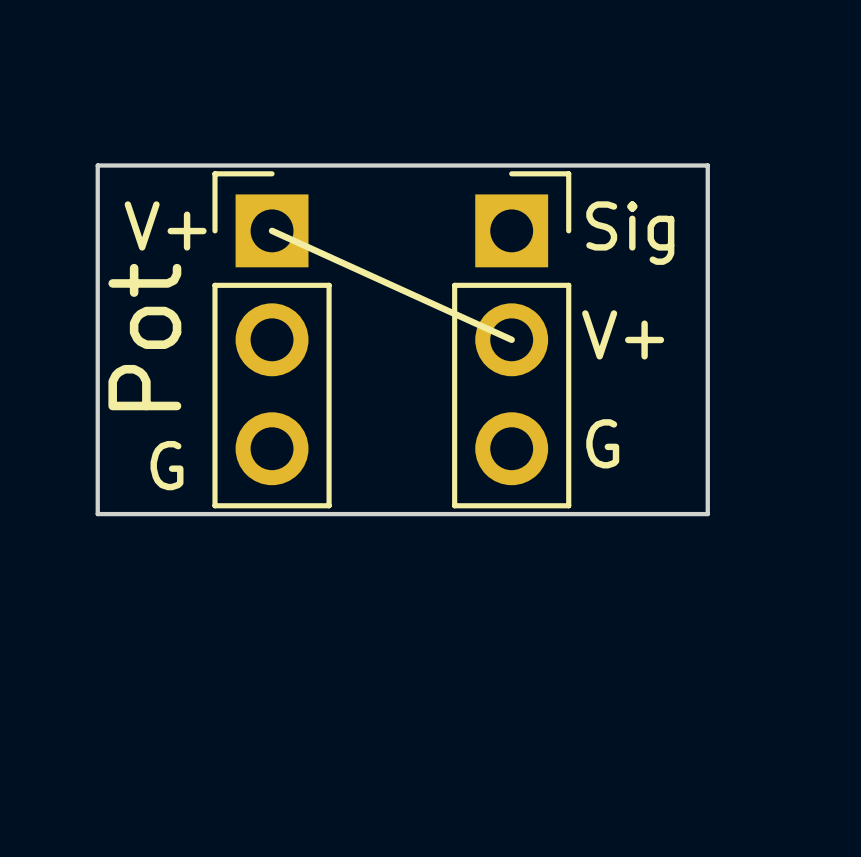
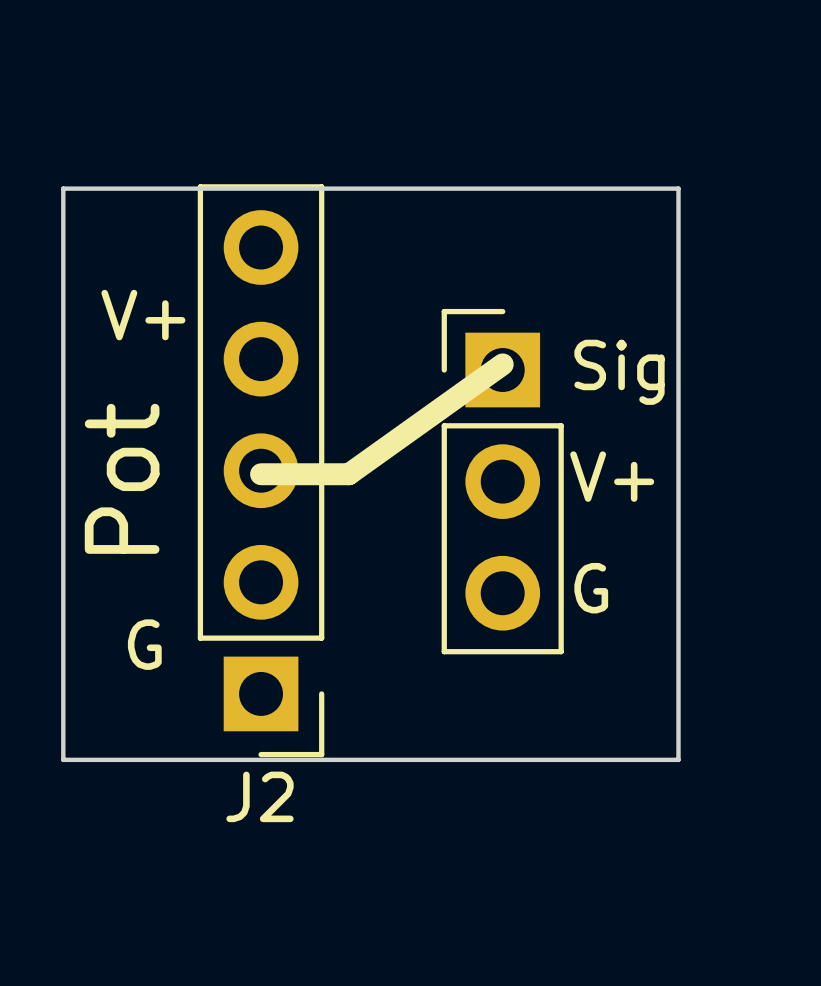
board edge: (97, 165) (97, 514) (707, 514) (707, 165) (97, 165) -> (63, 188) (63, 759) (678, 759) (678, 188) (63, 188)
part footprint: [452, 171, 572, 509] -> [441, 308, 564, 655]
text position: V+ (165, 225) -> V+ (143, 315)
line: none -> (502, 364) (348, 474) (261, 474)
line: (272, 230) (511, 339) -> none
J2: none -> (261, 470)
part: (272, 339) -> none
text position: G (166, 465) -> G (144, 644)

